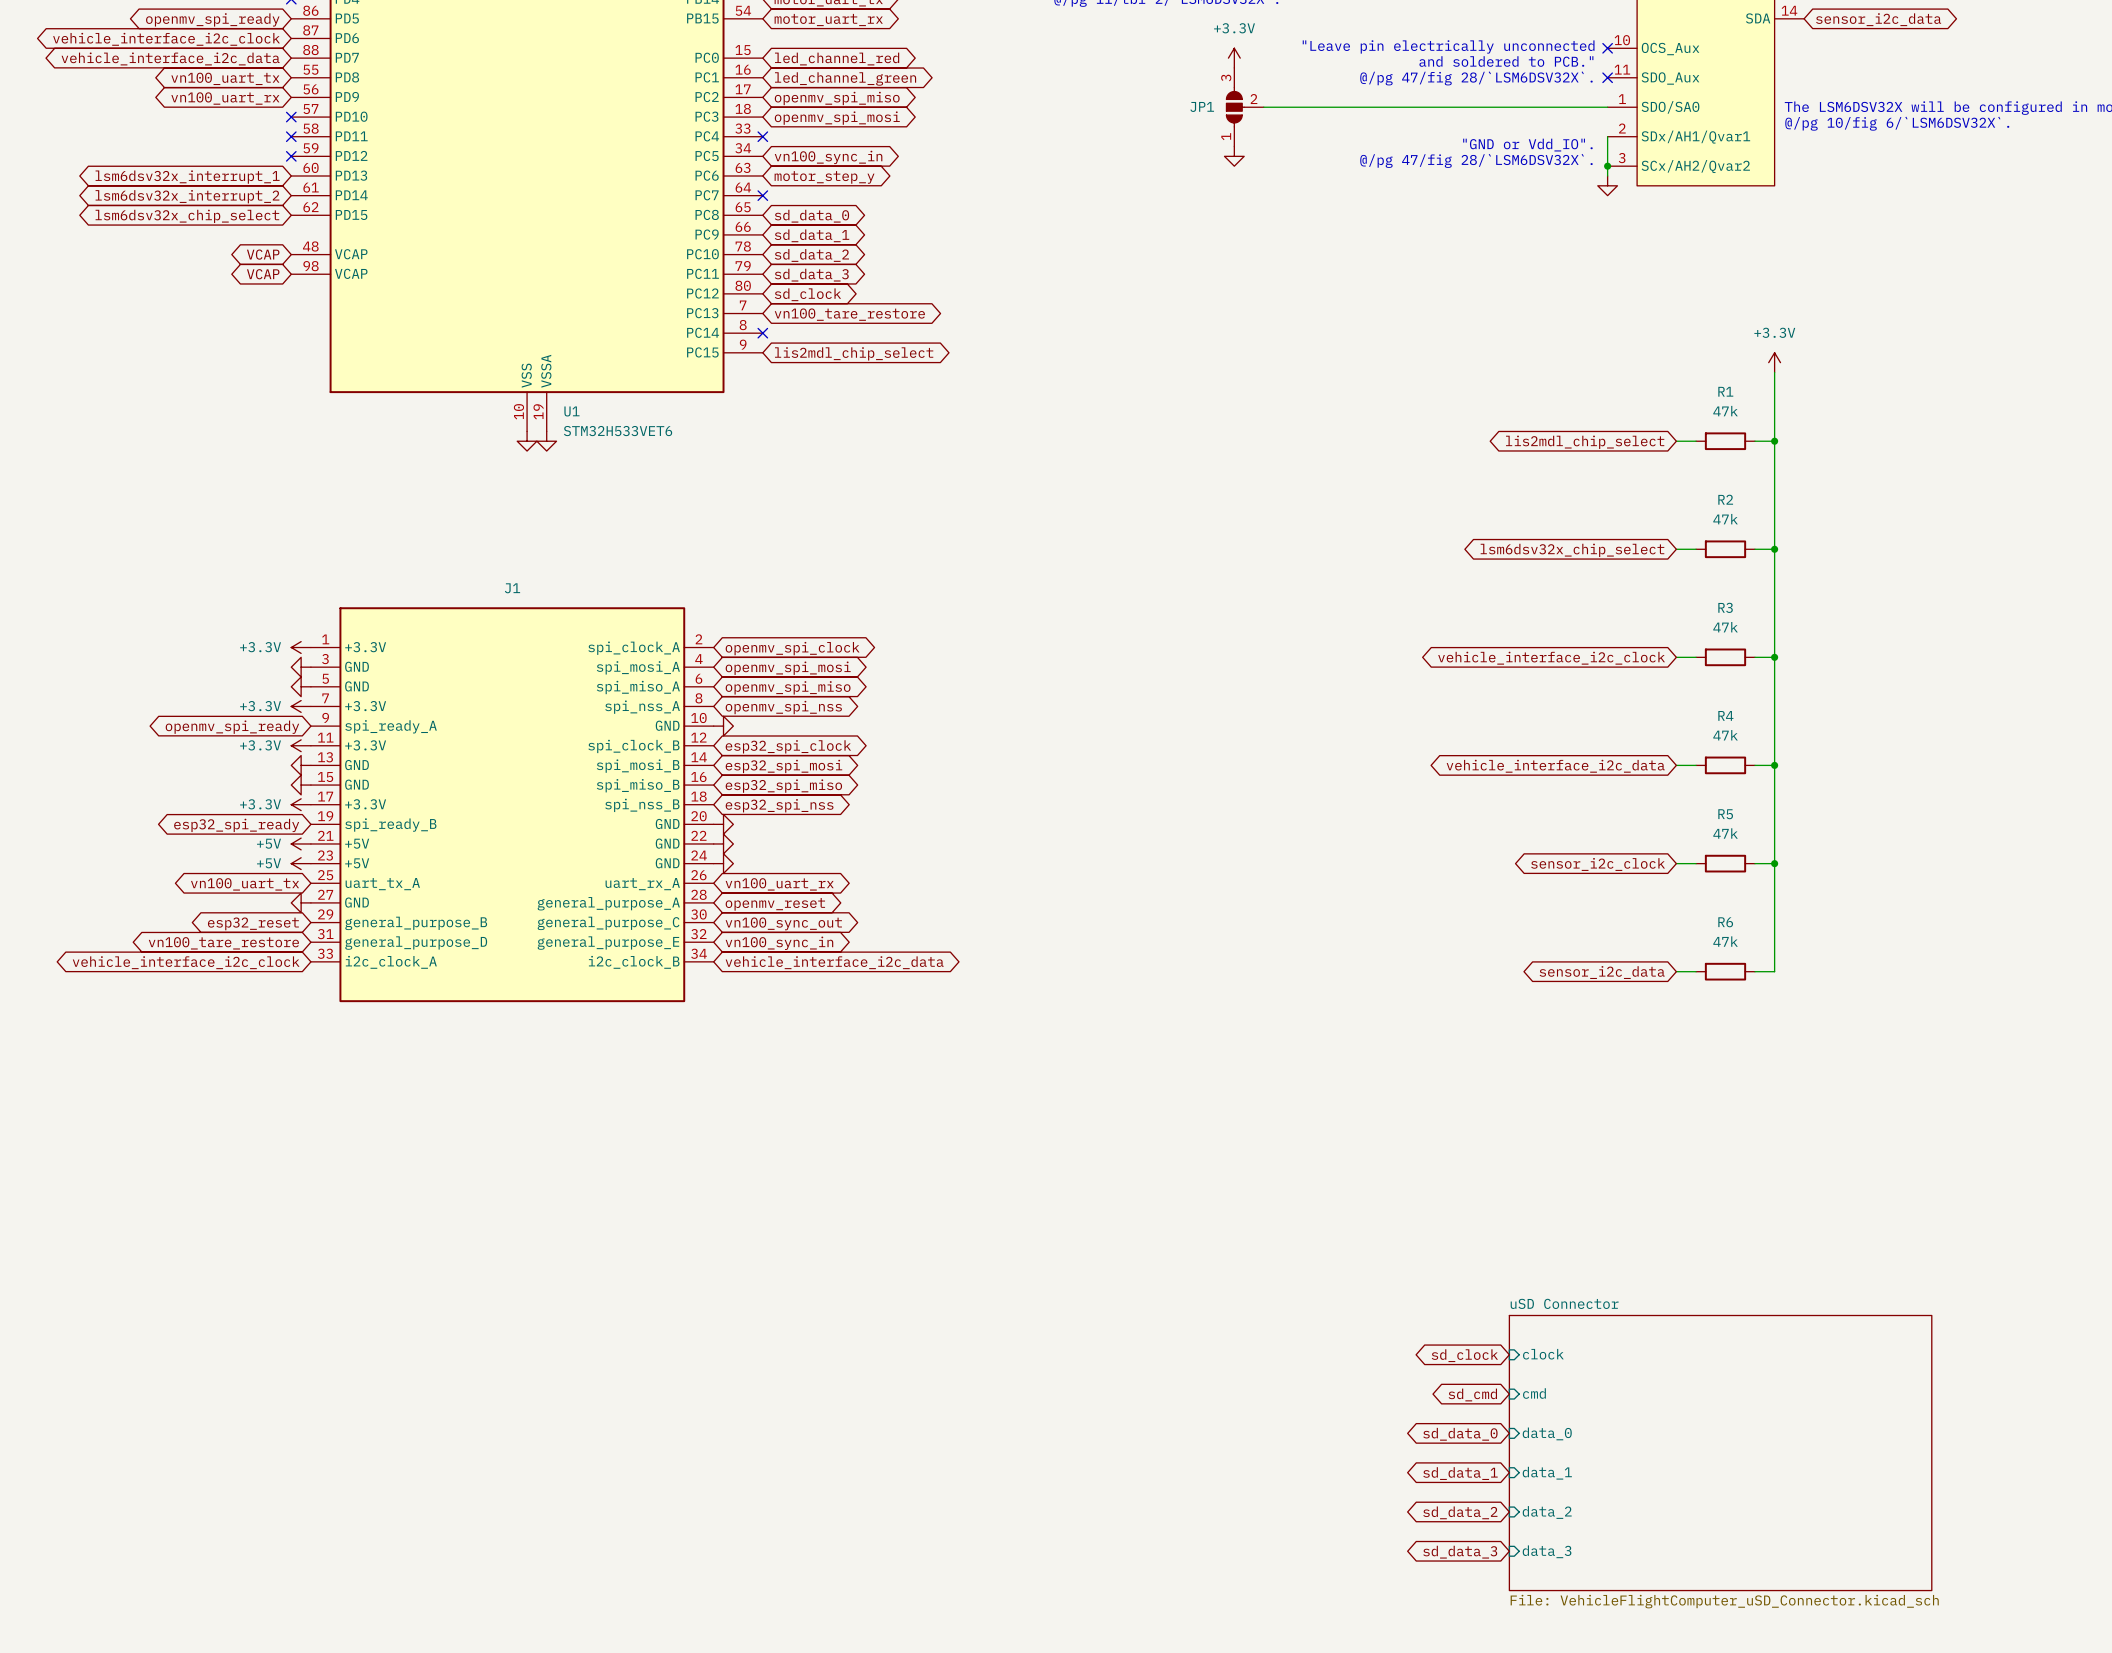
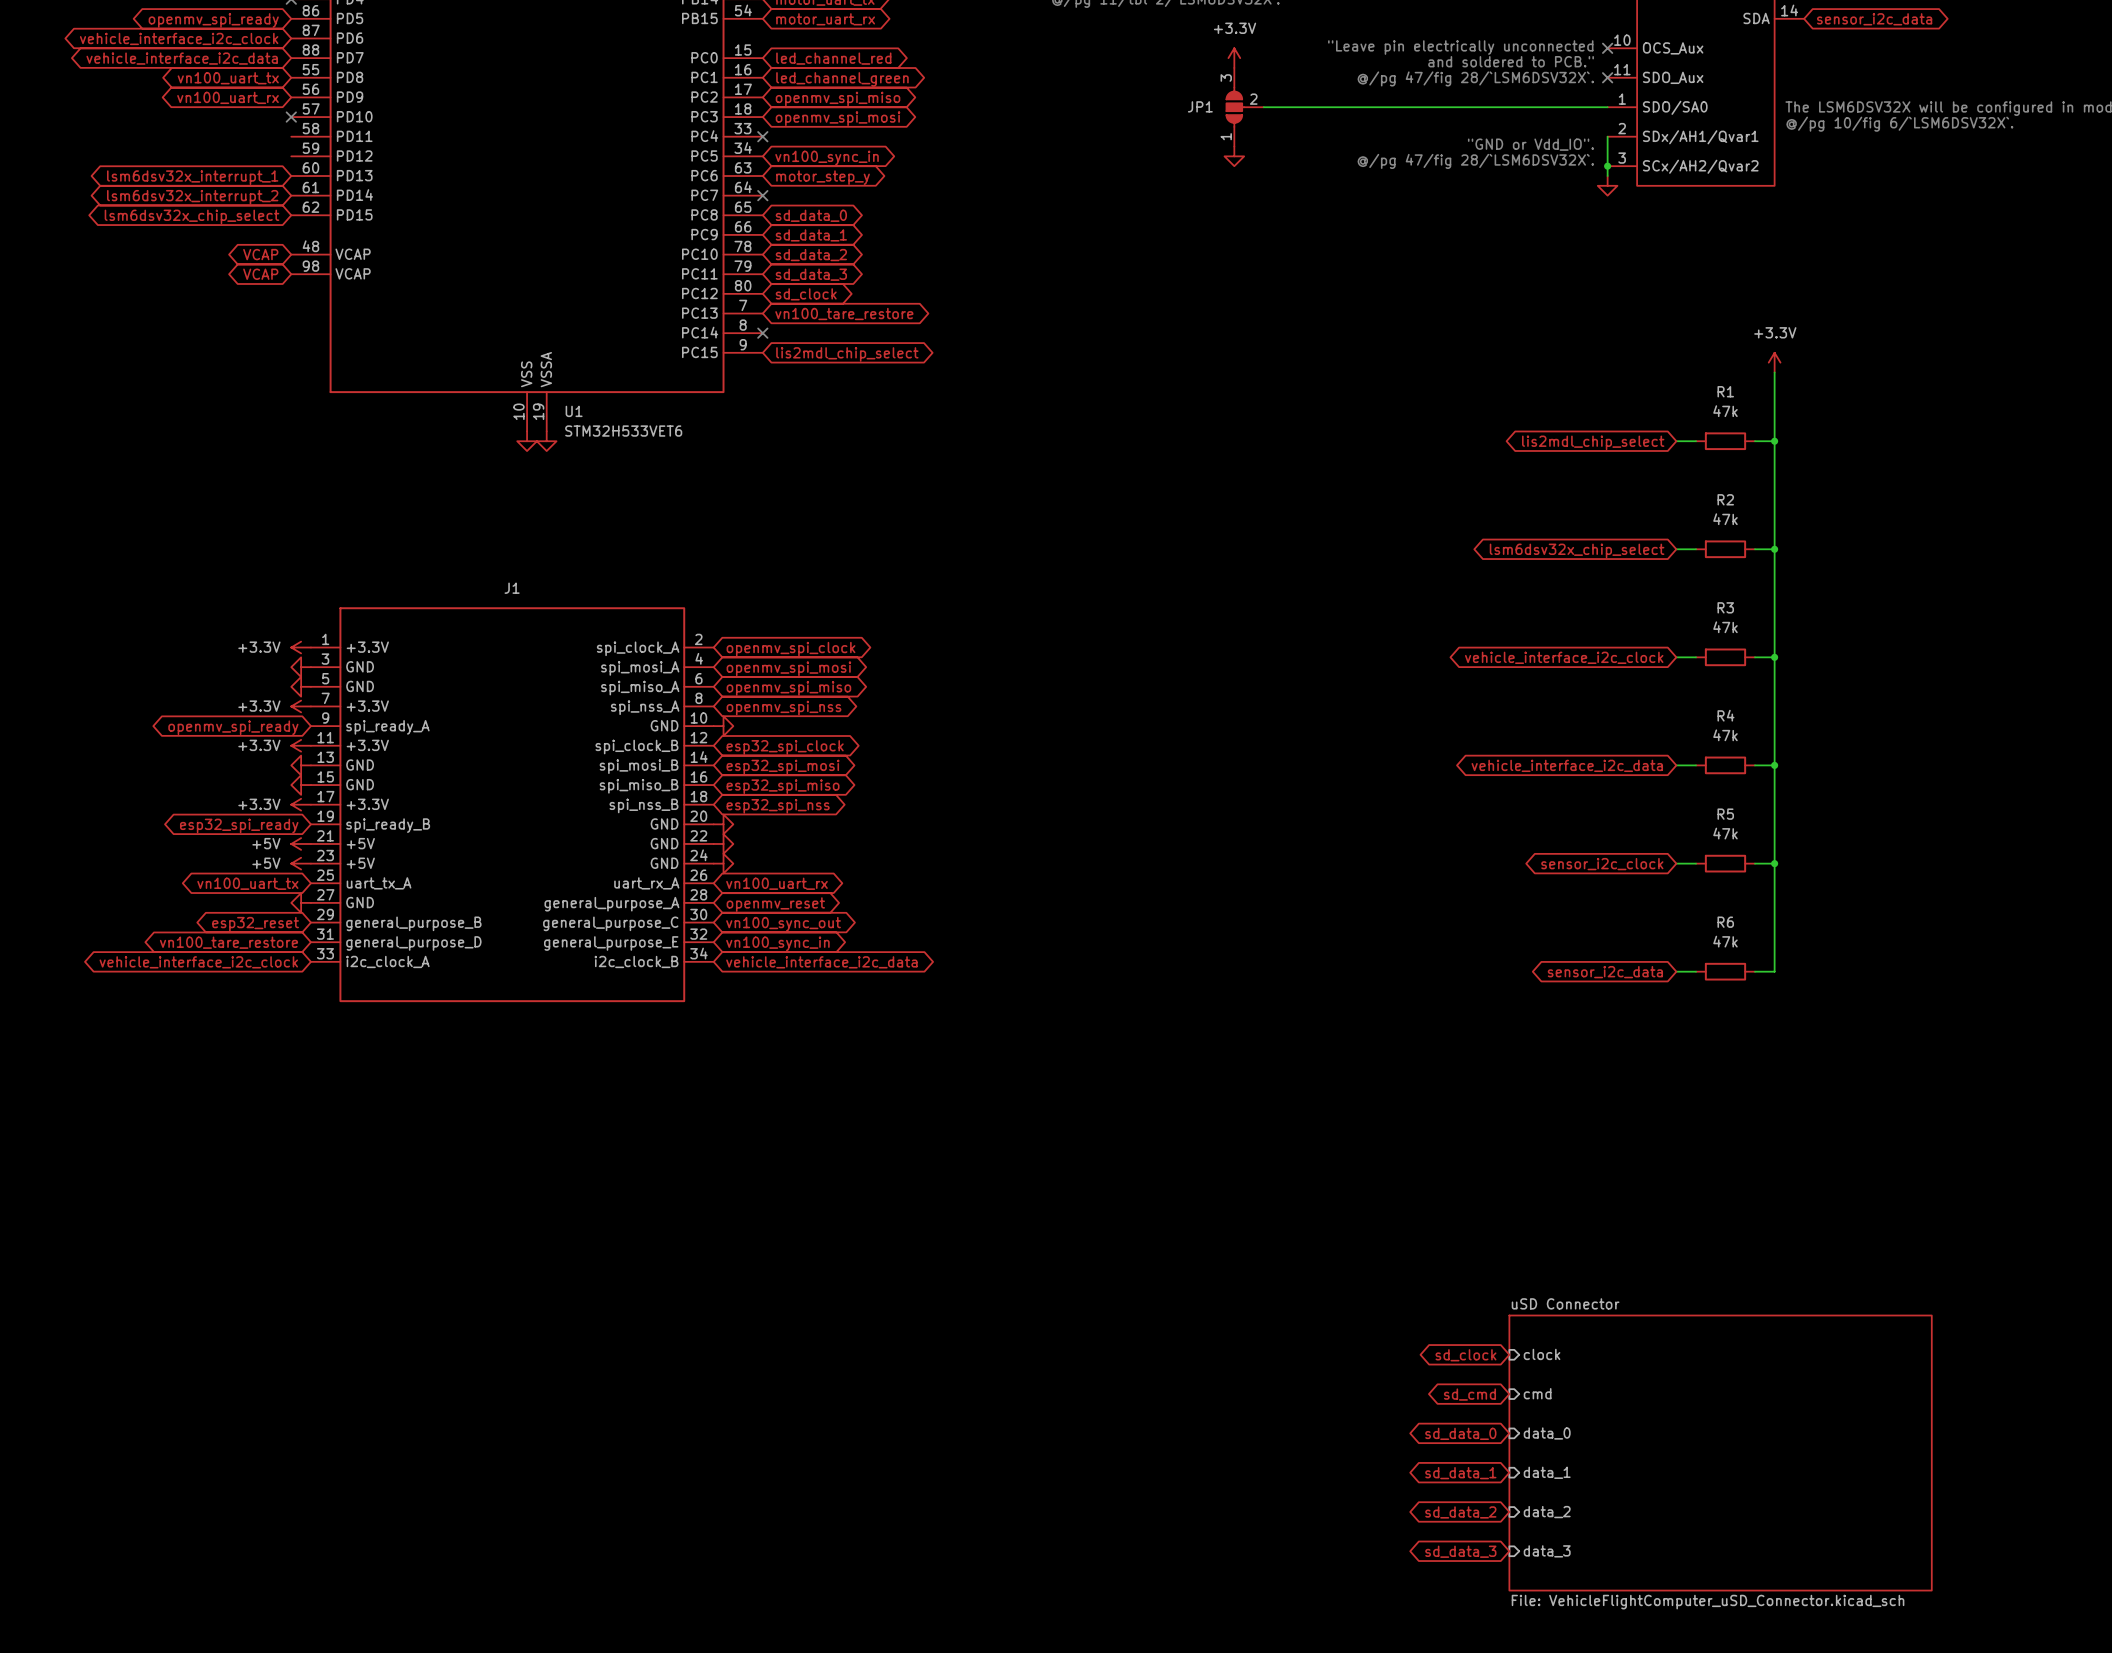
no-connect mark: (291, 136) -> none
no-connect mark: (291, 156) -> none

